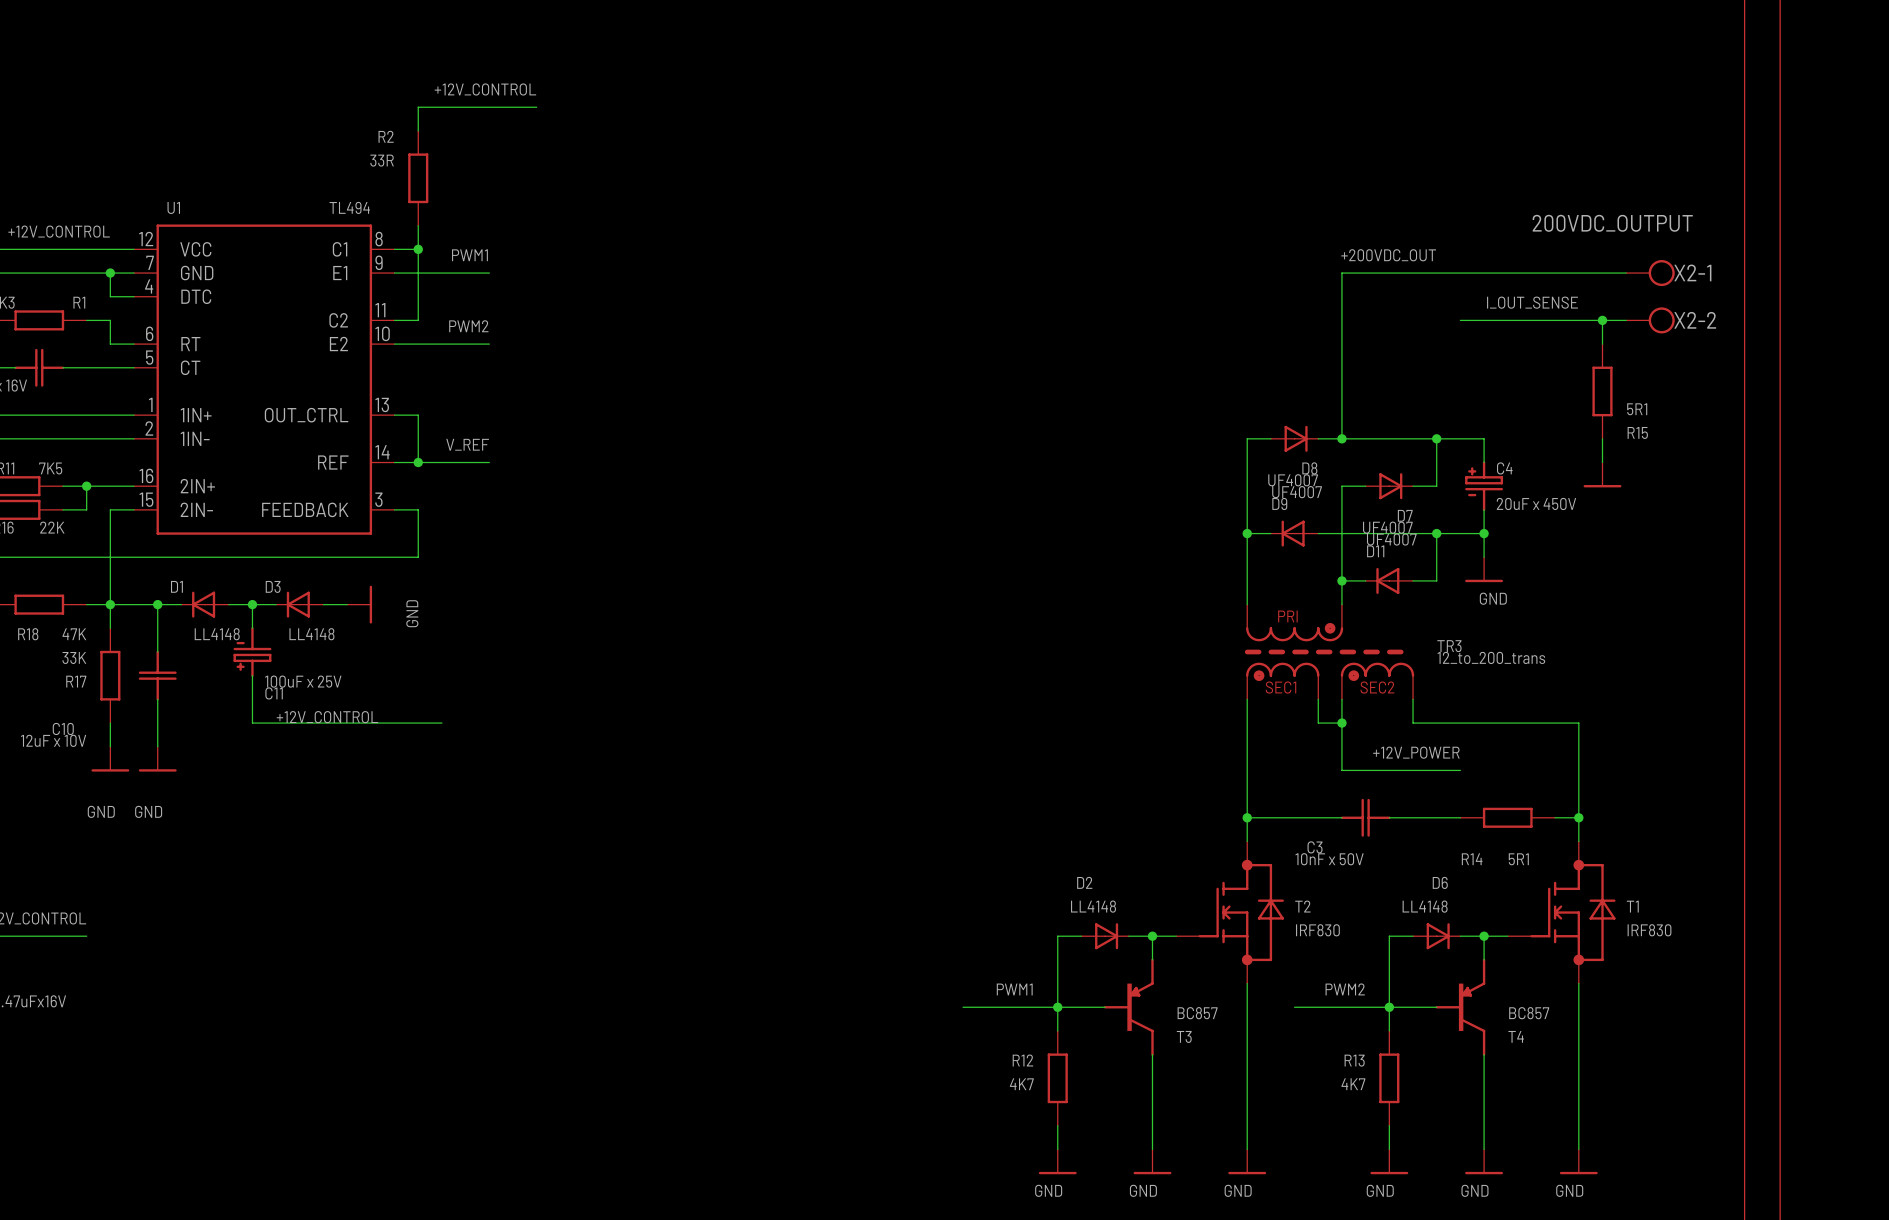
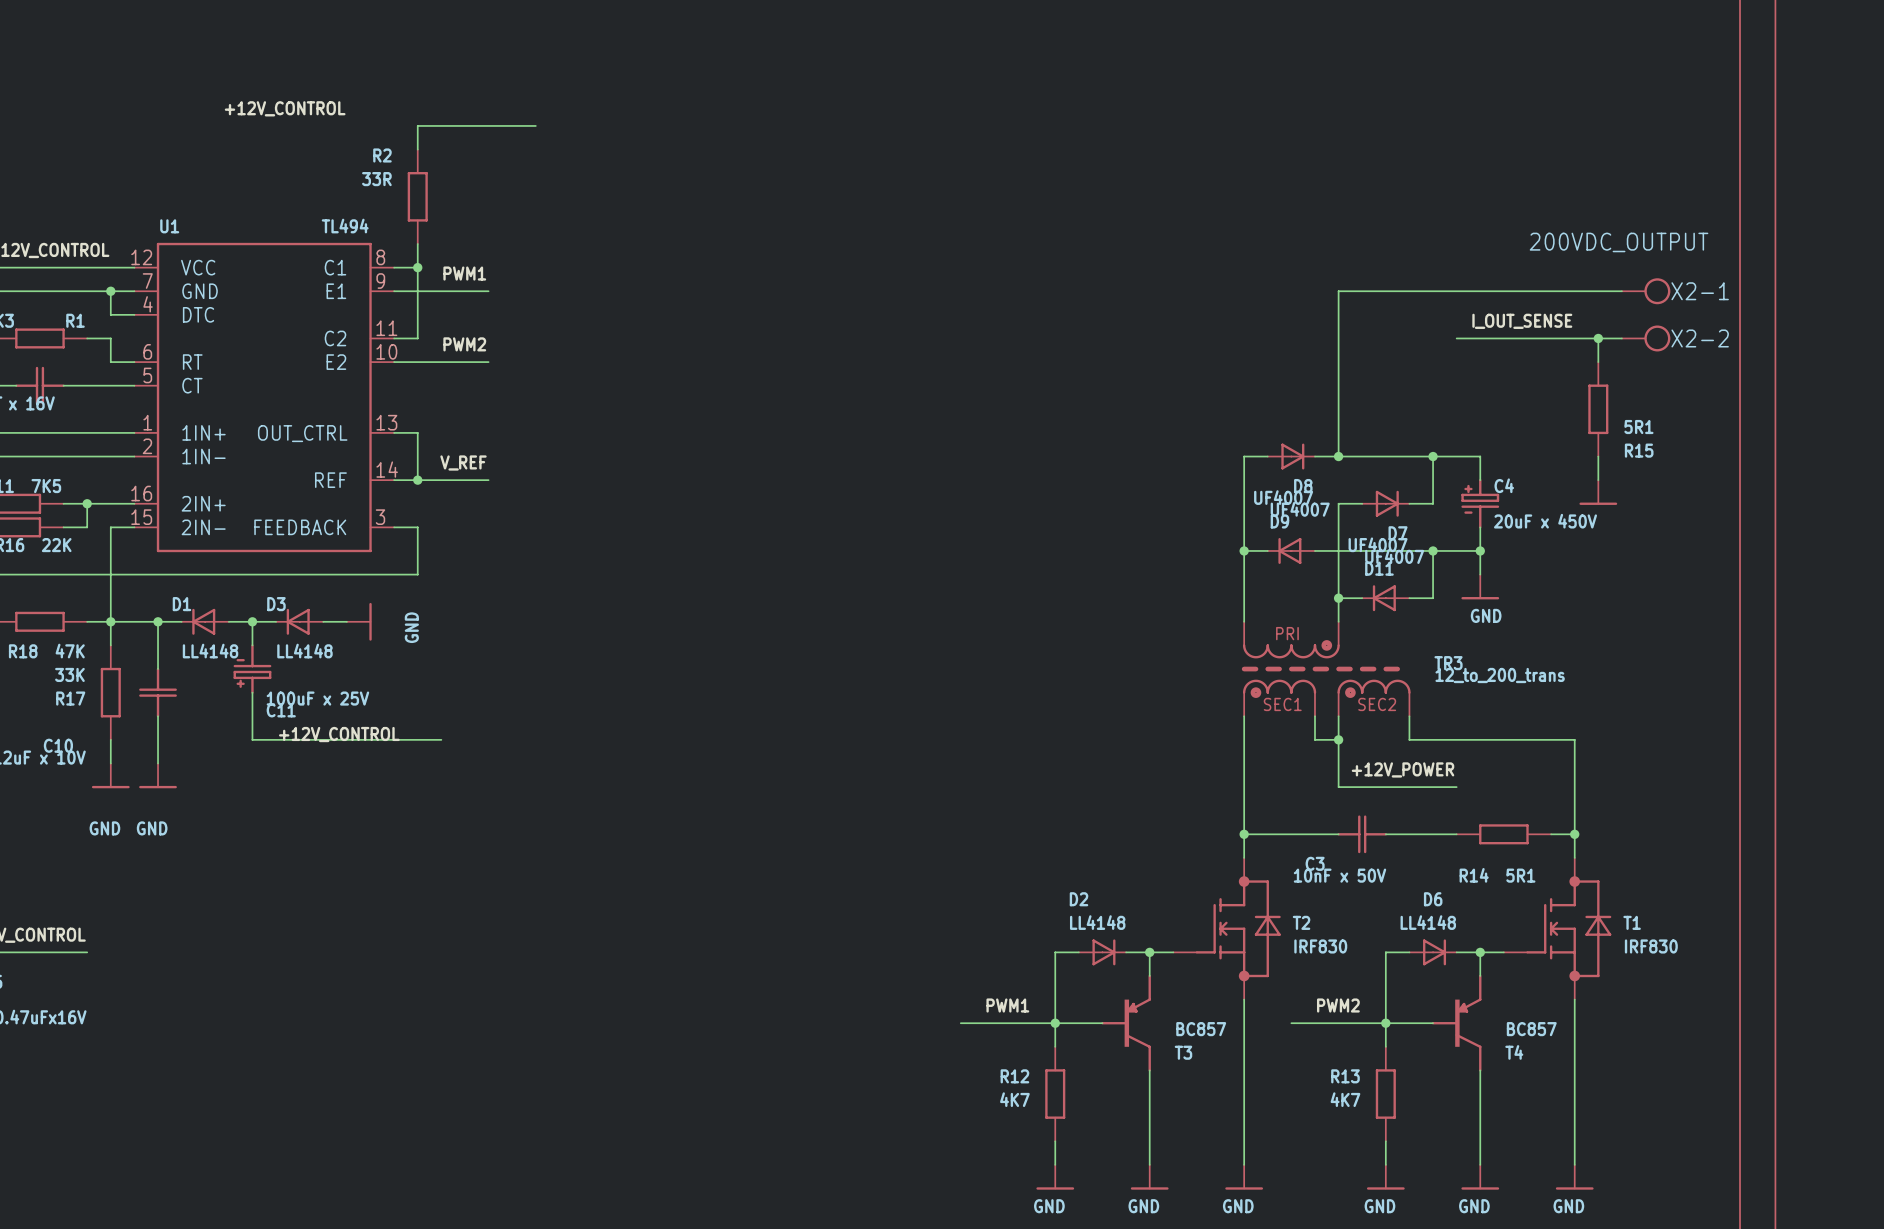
label position: +12V_CONTROL (485, 89) -> +12V_CONTROL (285, 108)
label: +200VDC_OUT (1388, 255) -> none

